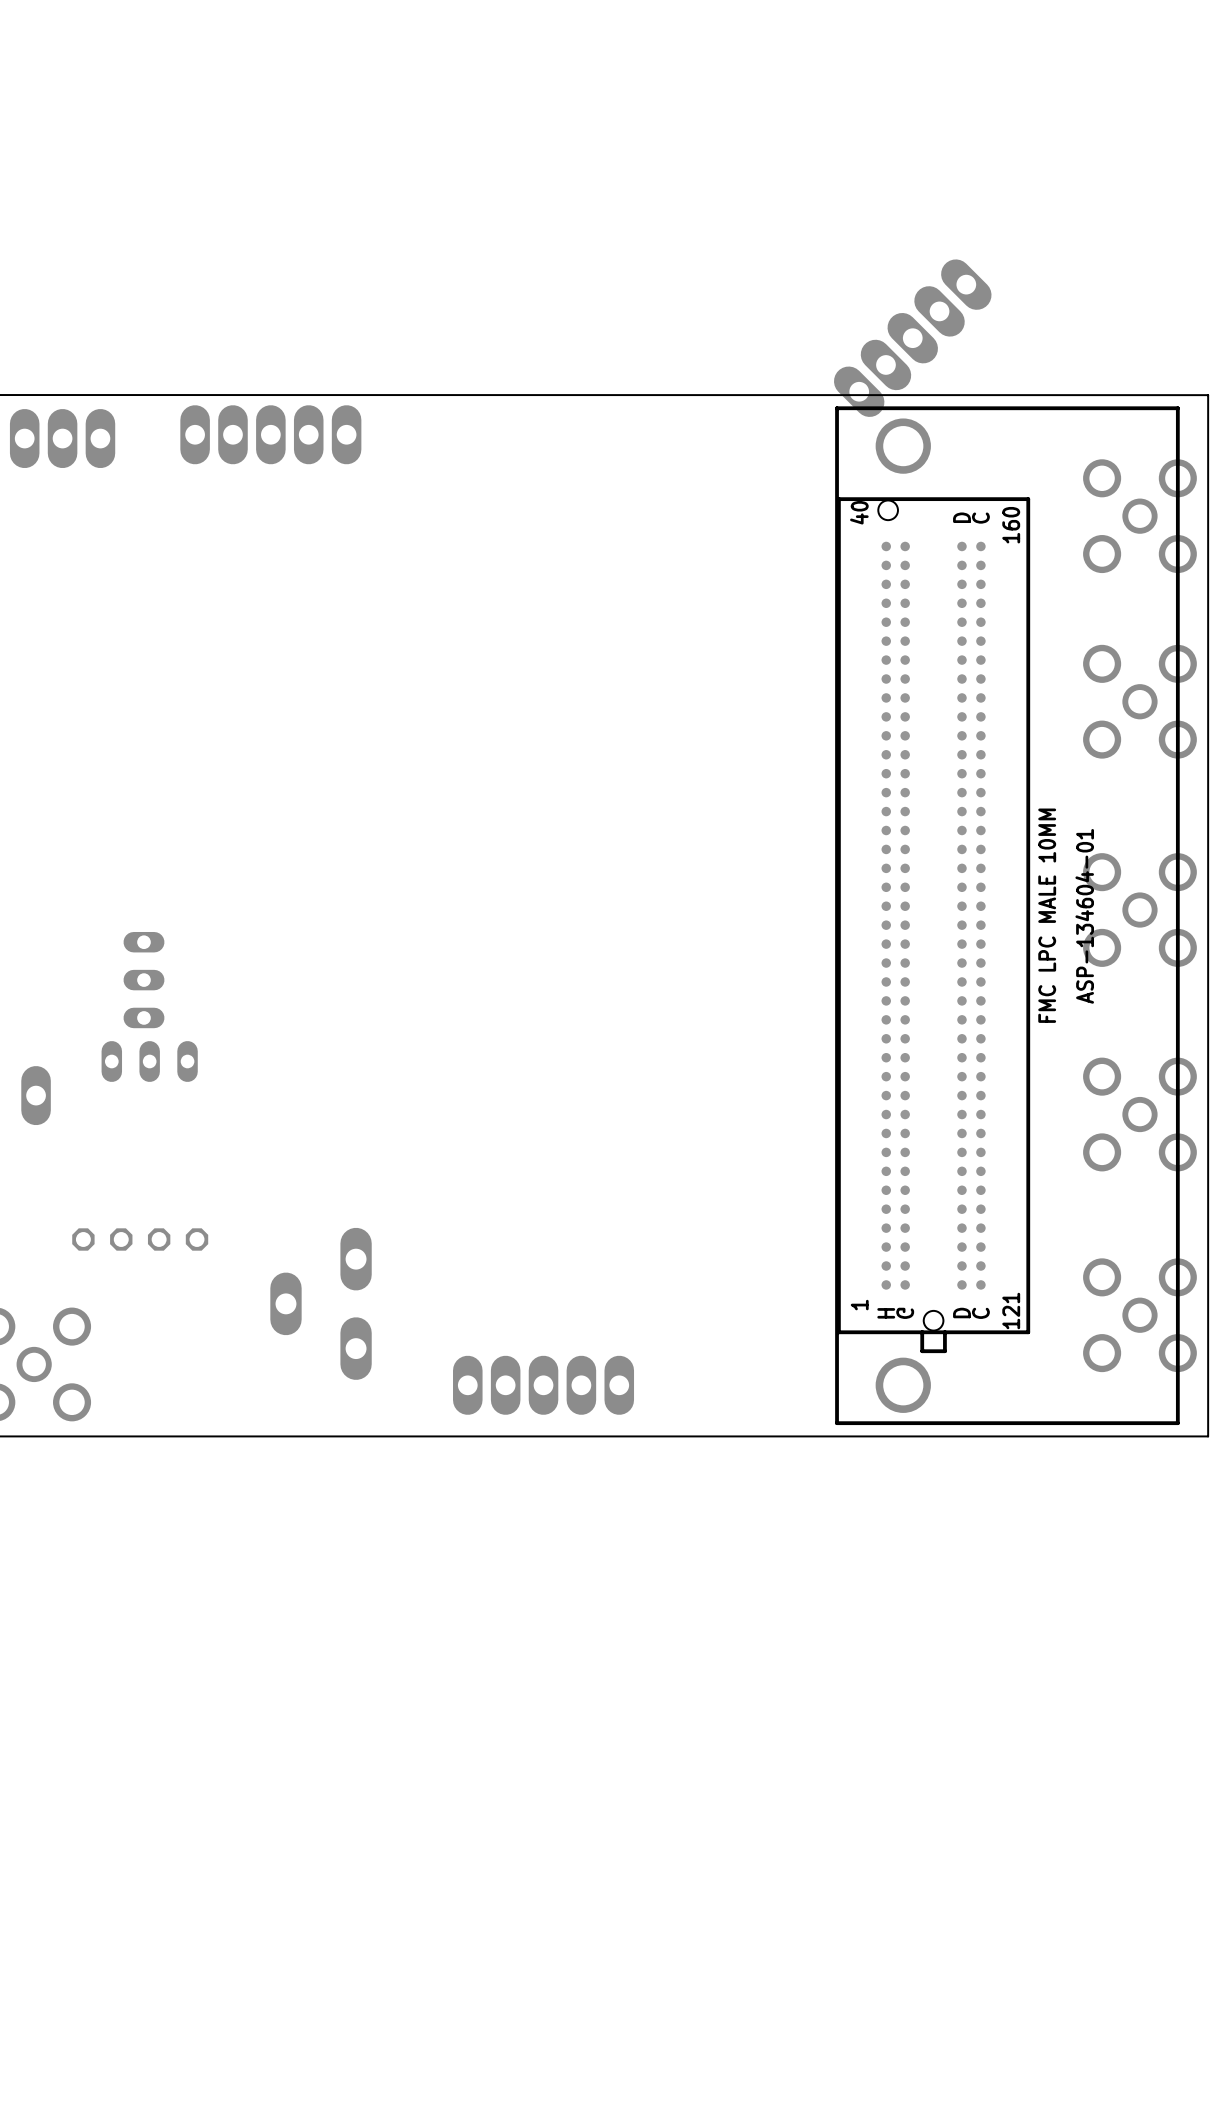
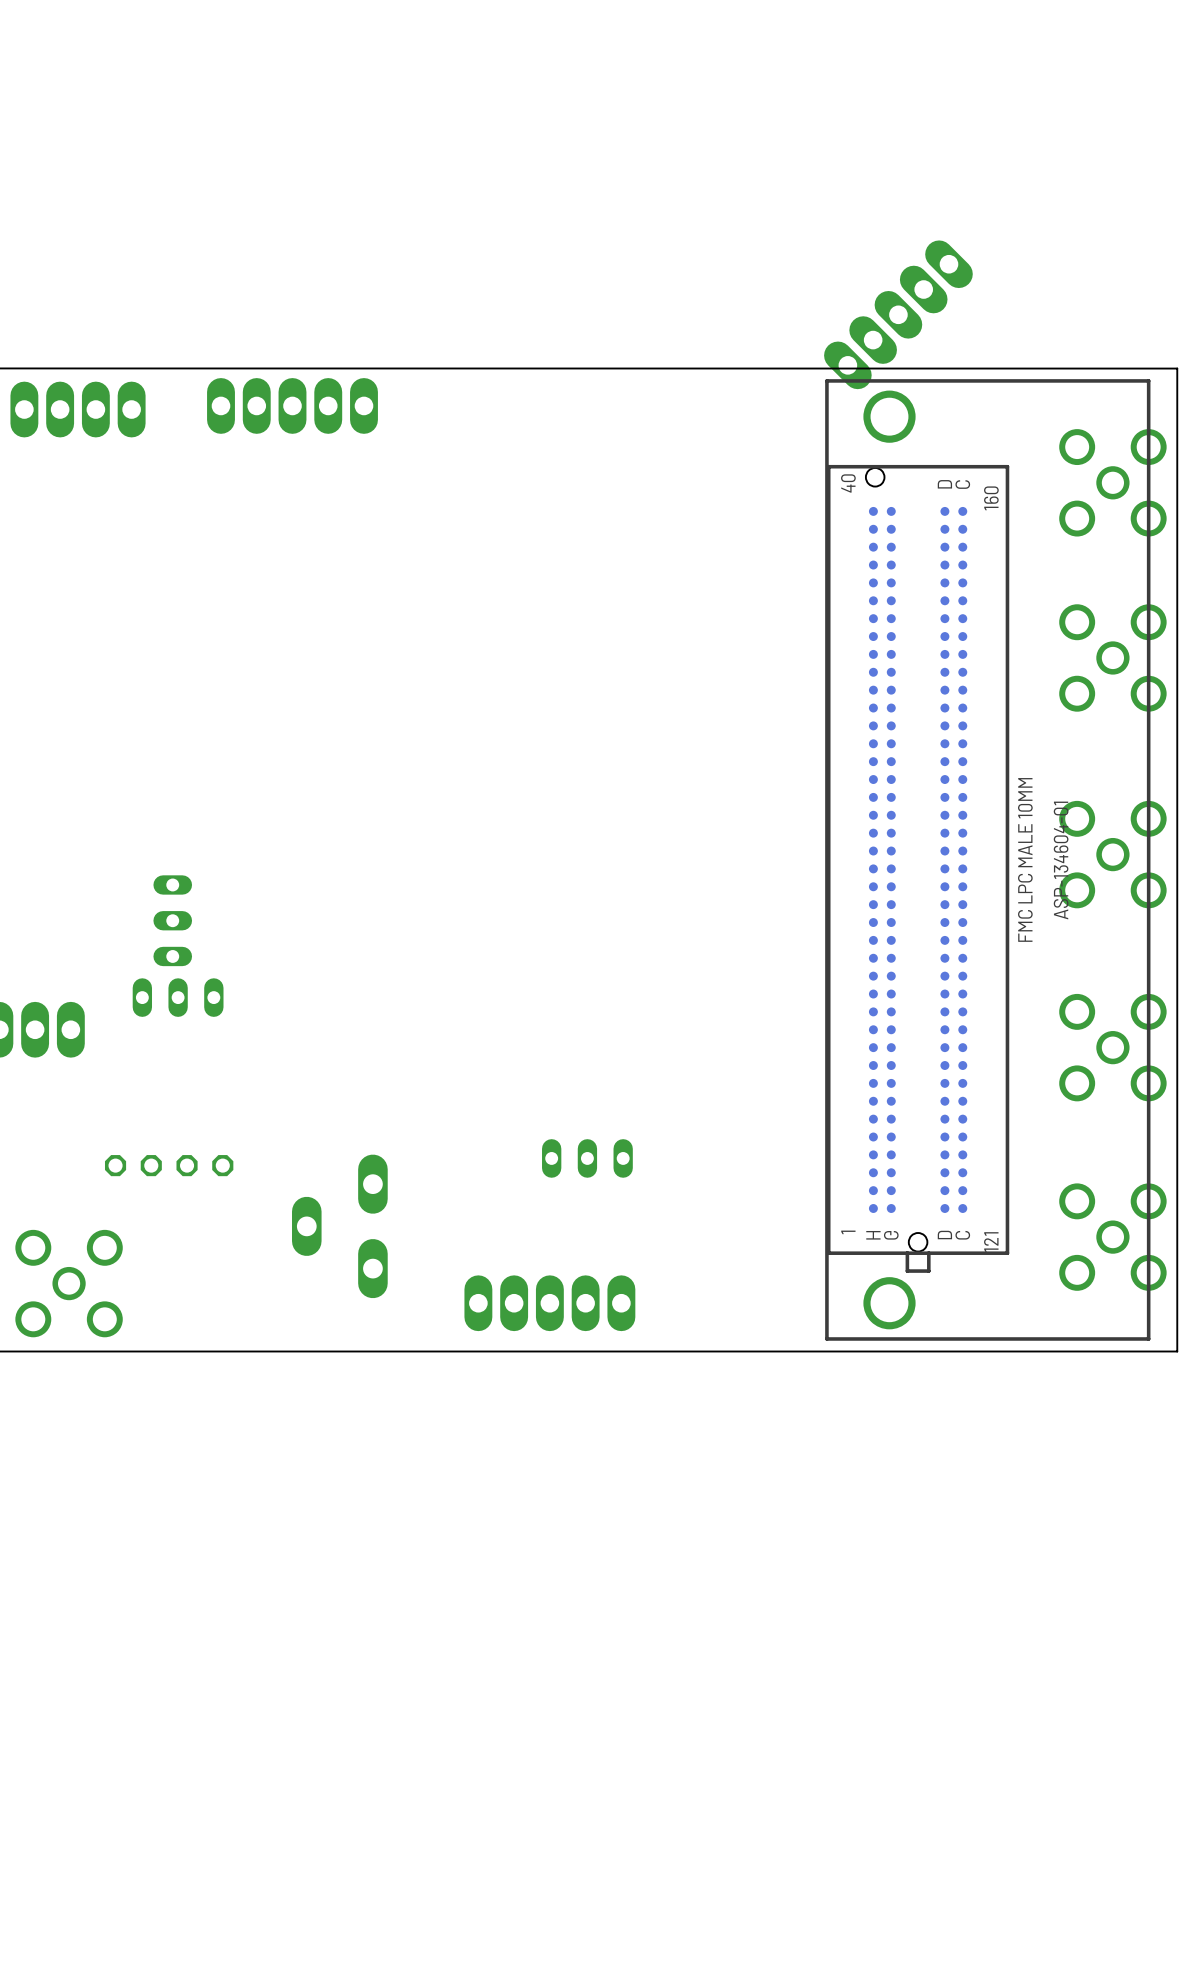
part: none -> (587, 1158)

